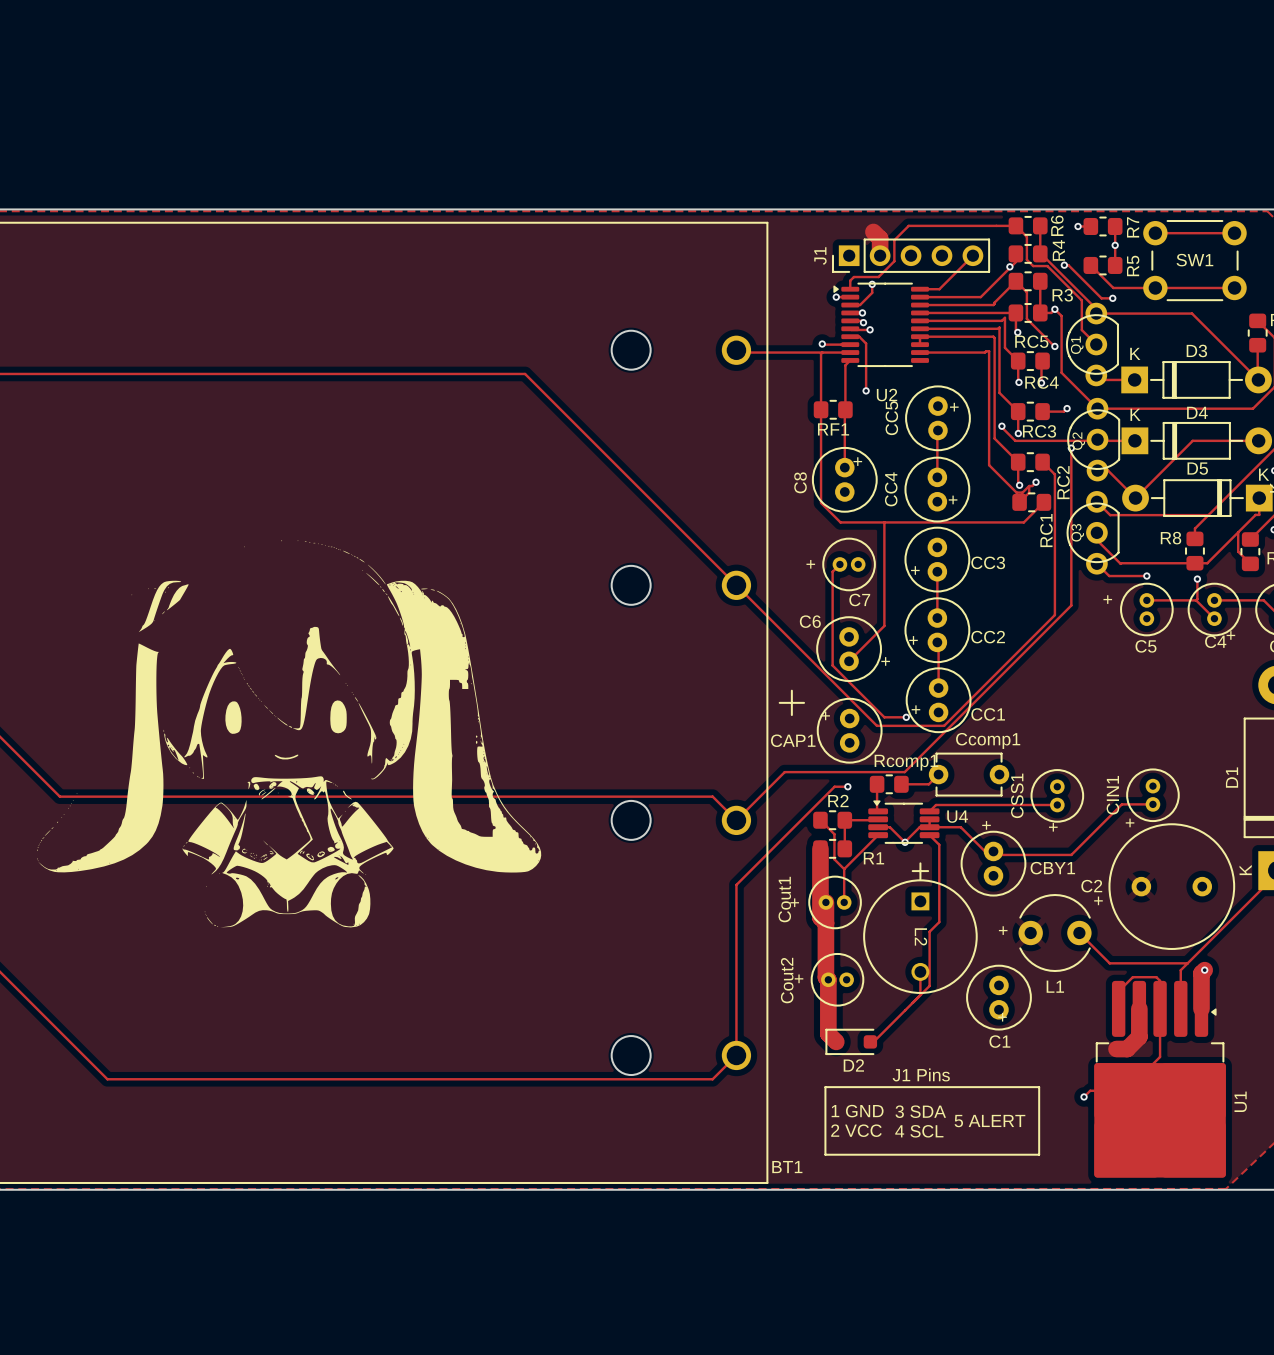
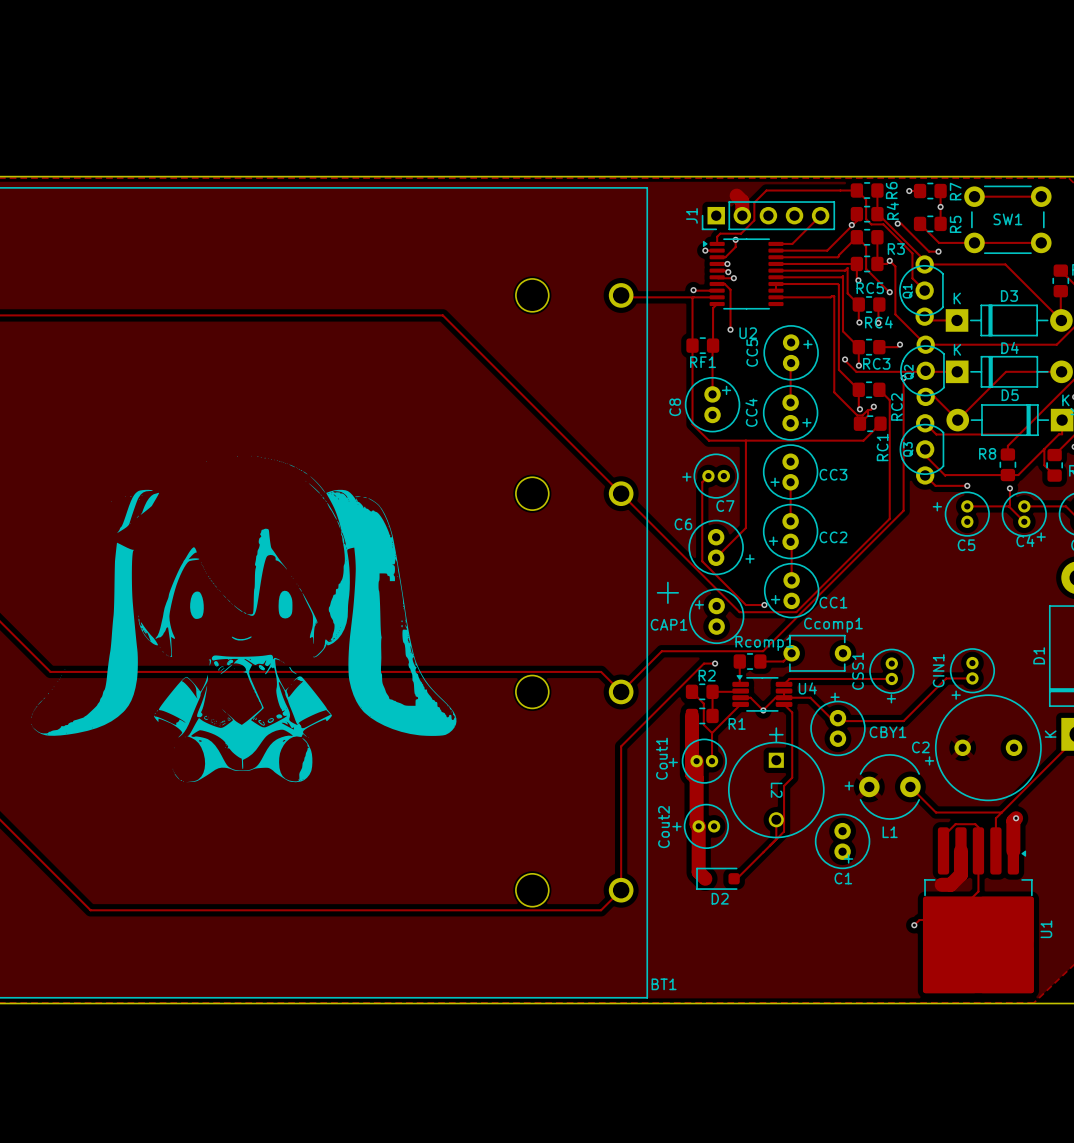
text: J1 Pins (921, 1074) -> none
line: (825, 1087) (1039, 1087) (1039, 1154) (825, 1154) (825, 1087) -> none
text: 1 GND (857, 1111) -> none
text: 3 SDA (920, 1111) -> none
text: 5 ALERT (989, 1121) -> none
text: 2 VCC (856, 1130) -> none
text: 4 SCL (919, 1131) -> none

